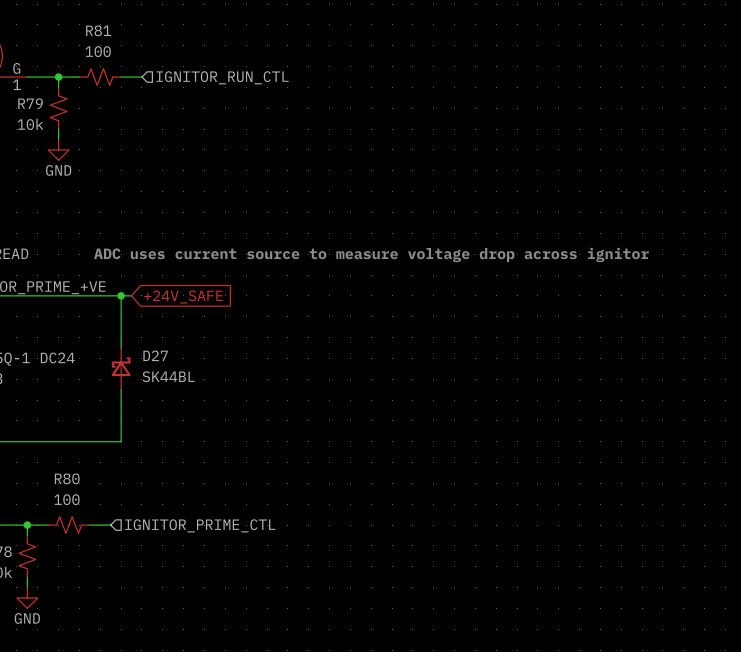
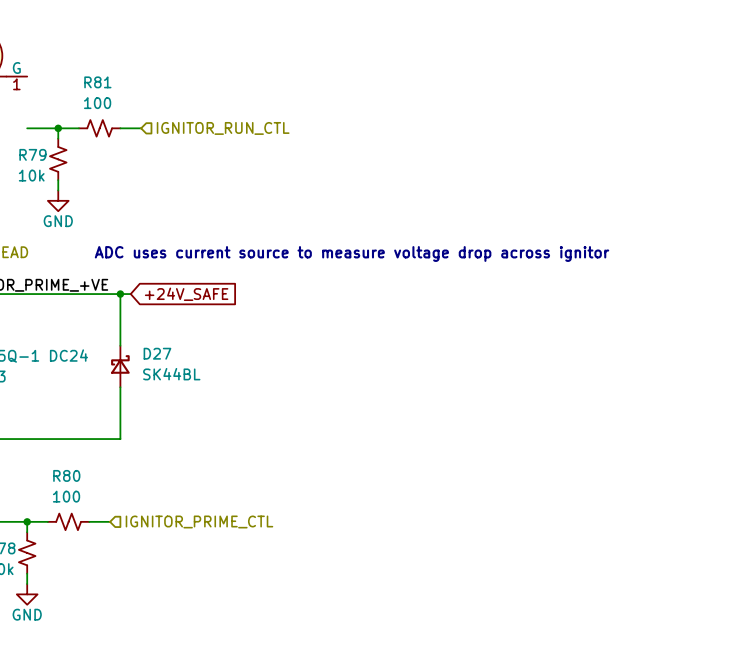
wire: (27, 77) (79, 77) -> (27, 128) (78, 128)
wire: (58, 77) (58, 87) -> (58, 180) (58, 190)
junction: (58, 77) -> none
R81 position: (100, 77) -> (99, 128)
wire: (121, 77) (141, 77) -> (120, 128) (141, 128)
hierarchical label position: IGNITOR_RUN_CTL (222, 77) -> IGNITOR_RUN_CTL (223, 128)
R79 position: (58, 108) -> (58, 159)
junction: none -> (58, 128)
power symbol: GND (58, 149) -> none
power symbol: none -> GND (58, 200)

